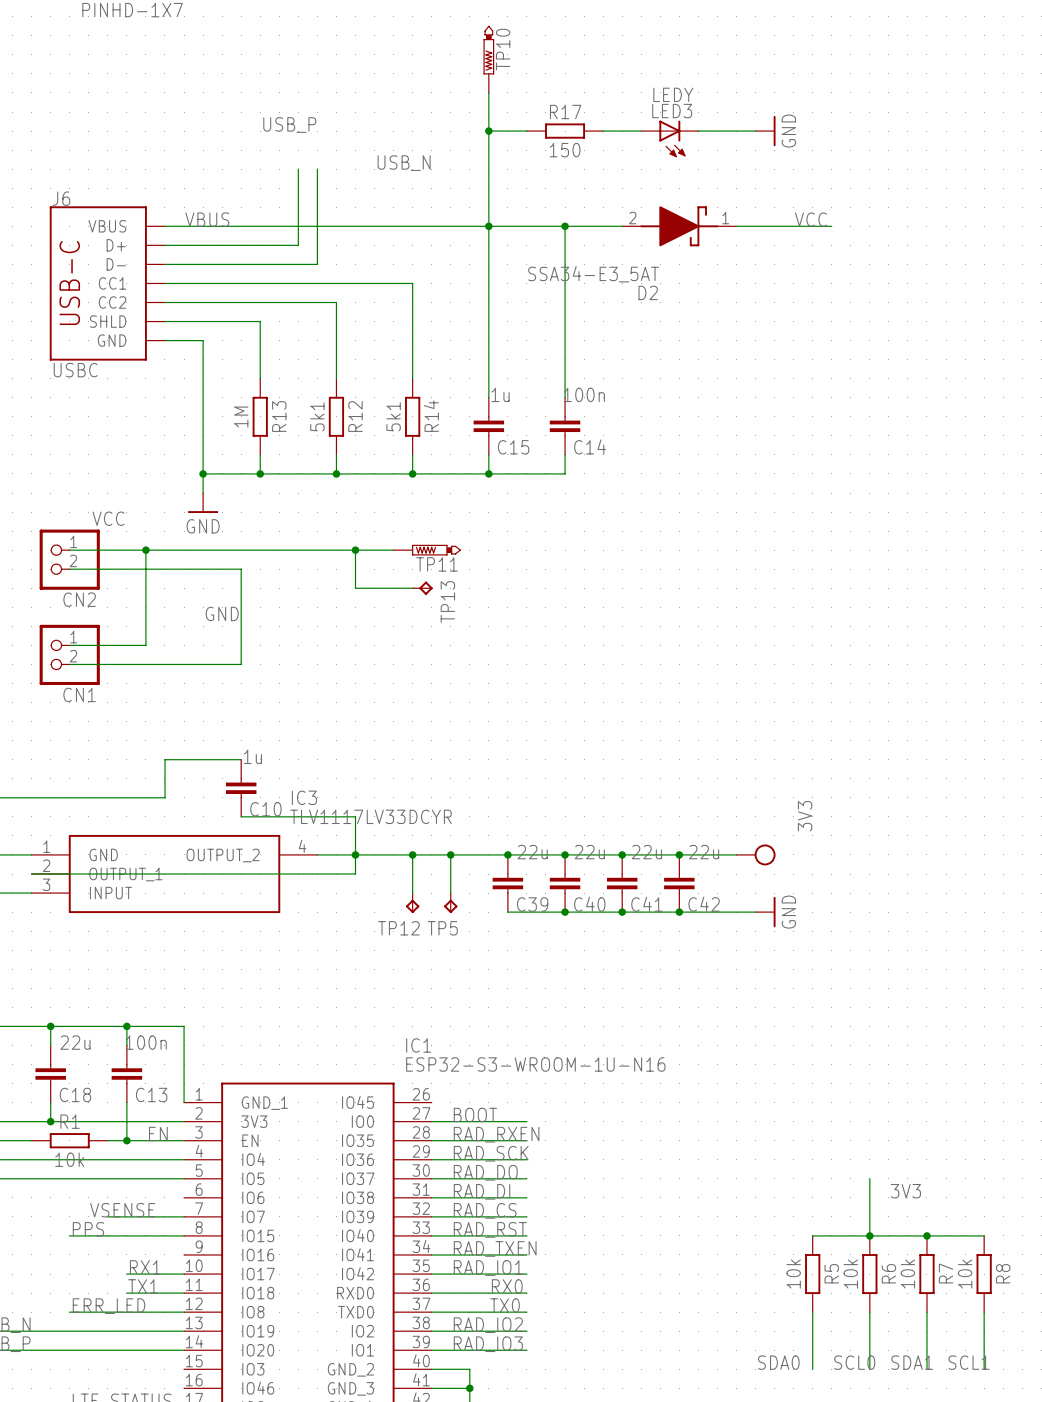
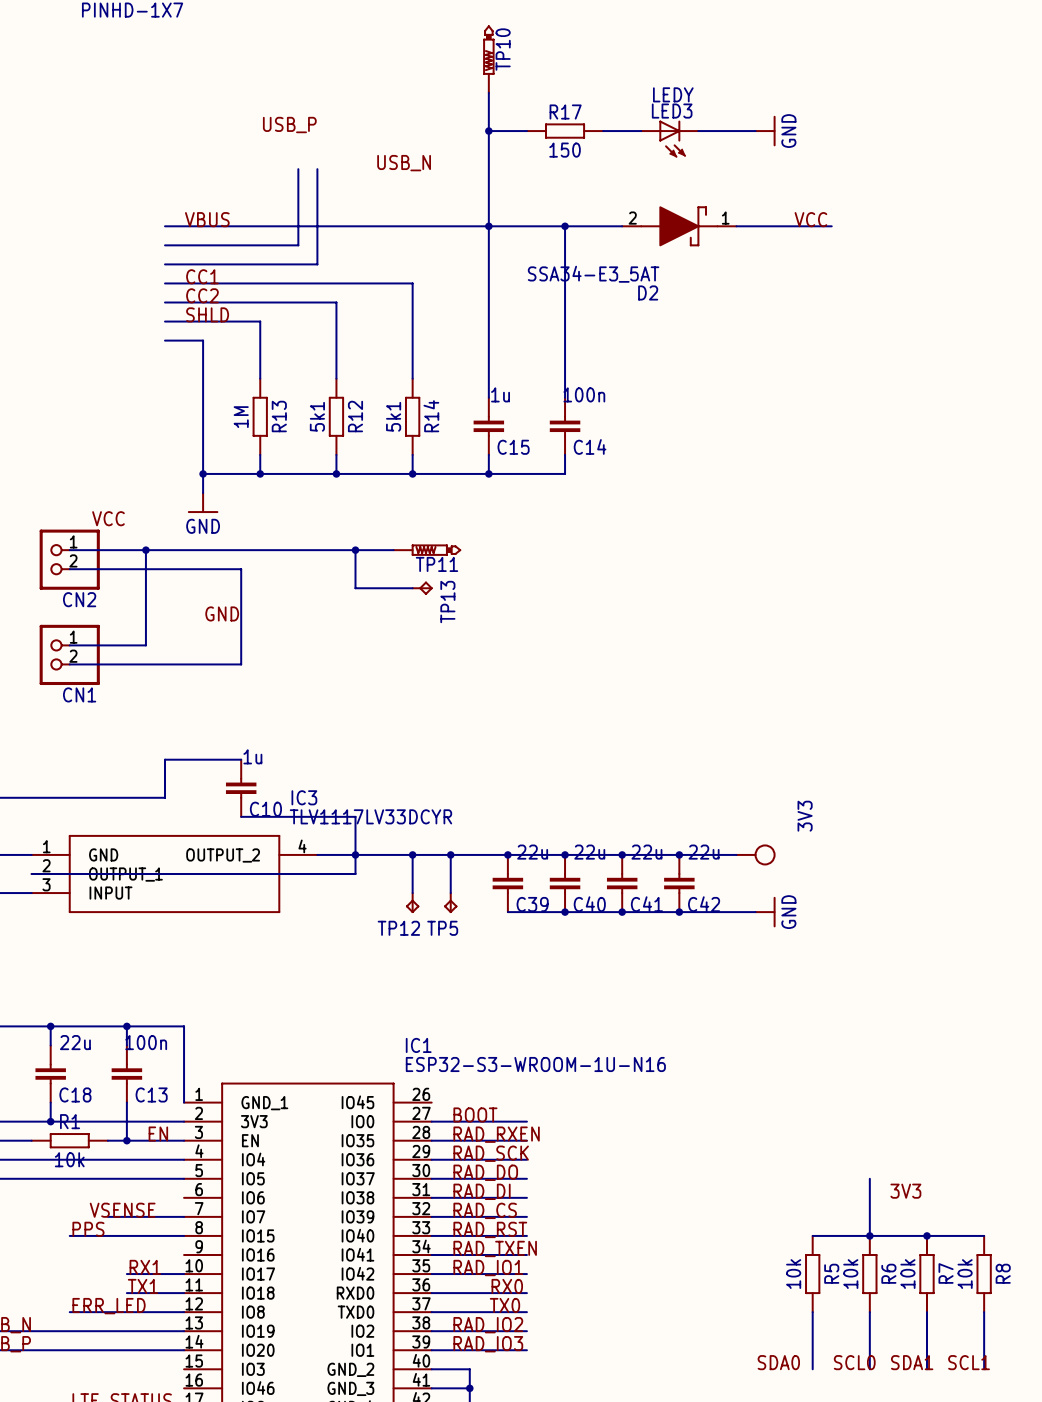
label: none -> CC1 (202, 276)
J6: USBC (107, 283) -> none
label: none -> CC2 (202, 295)
label: none -> SHLD (207, 314)

